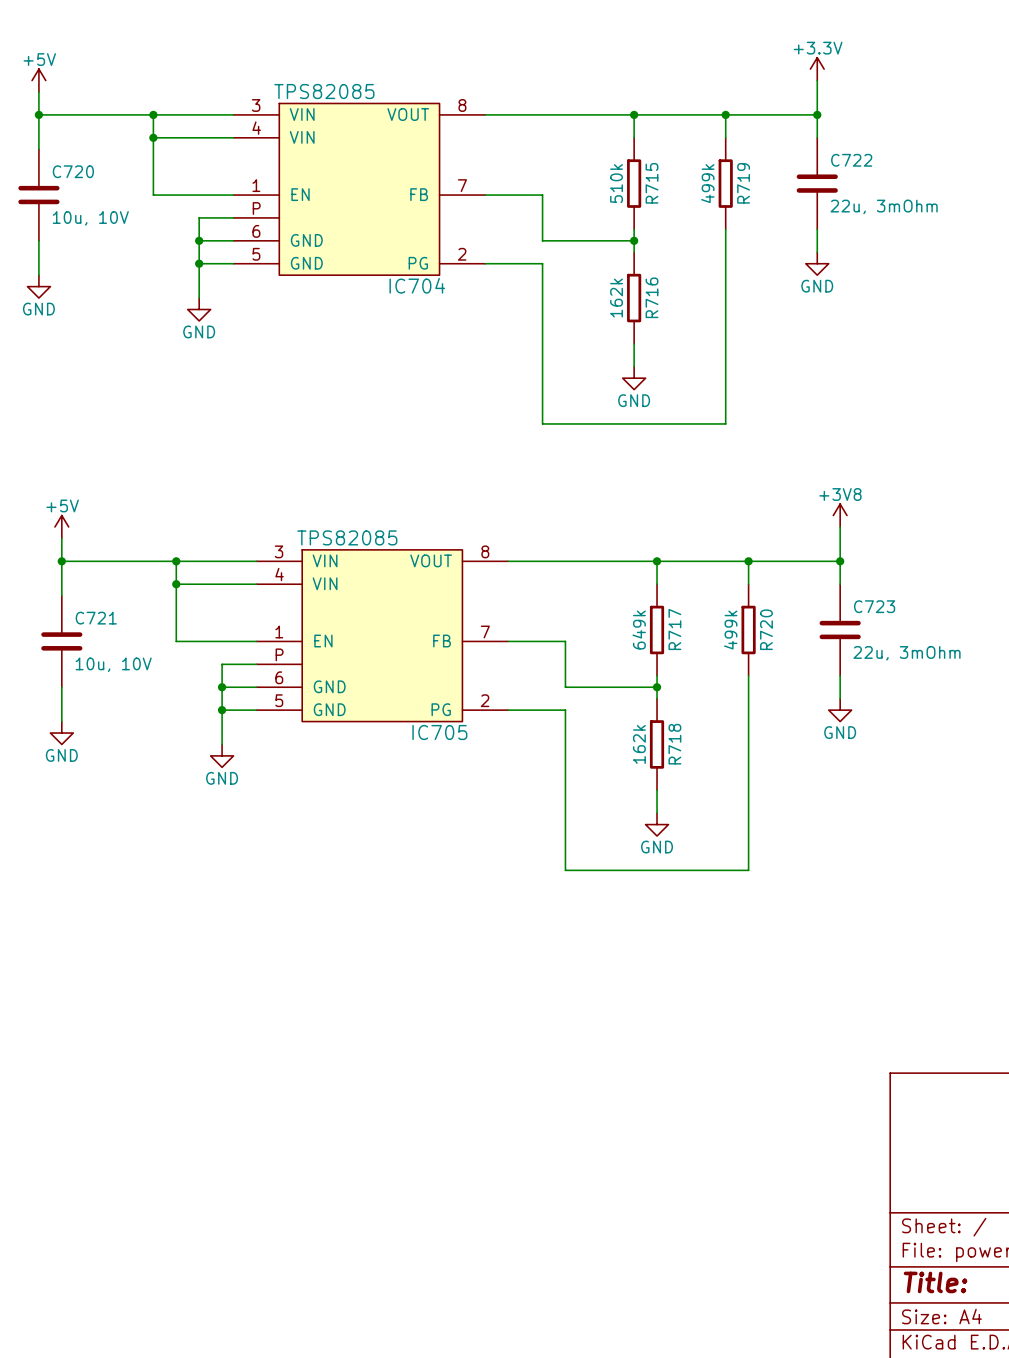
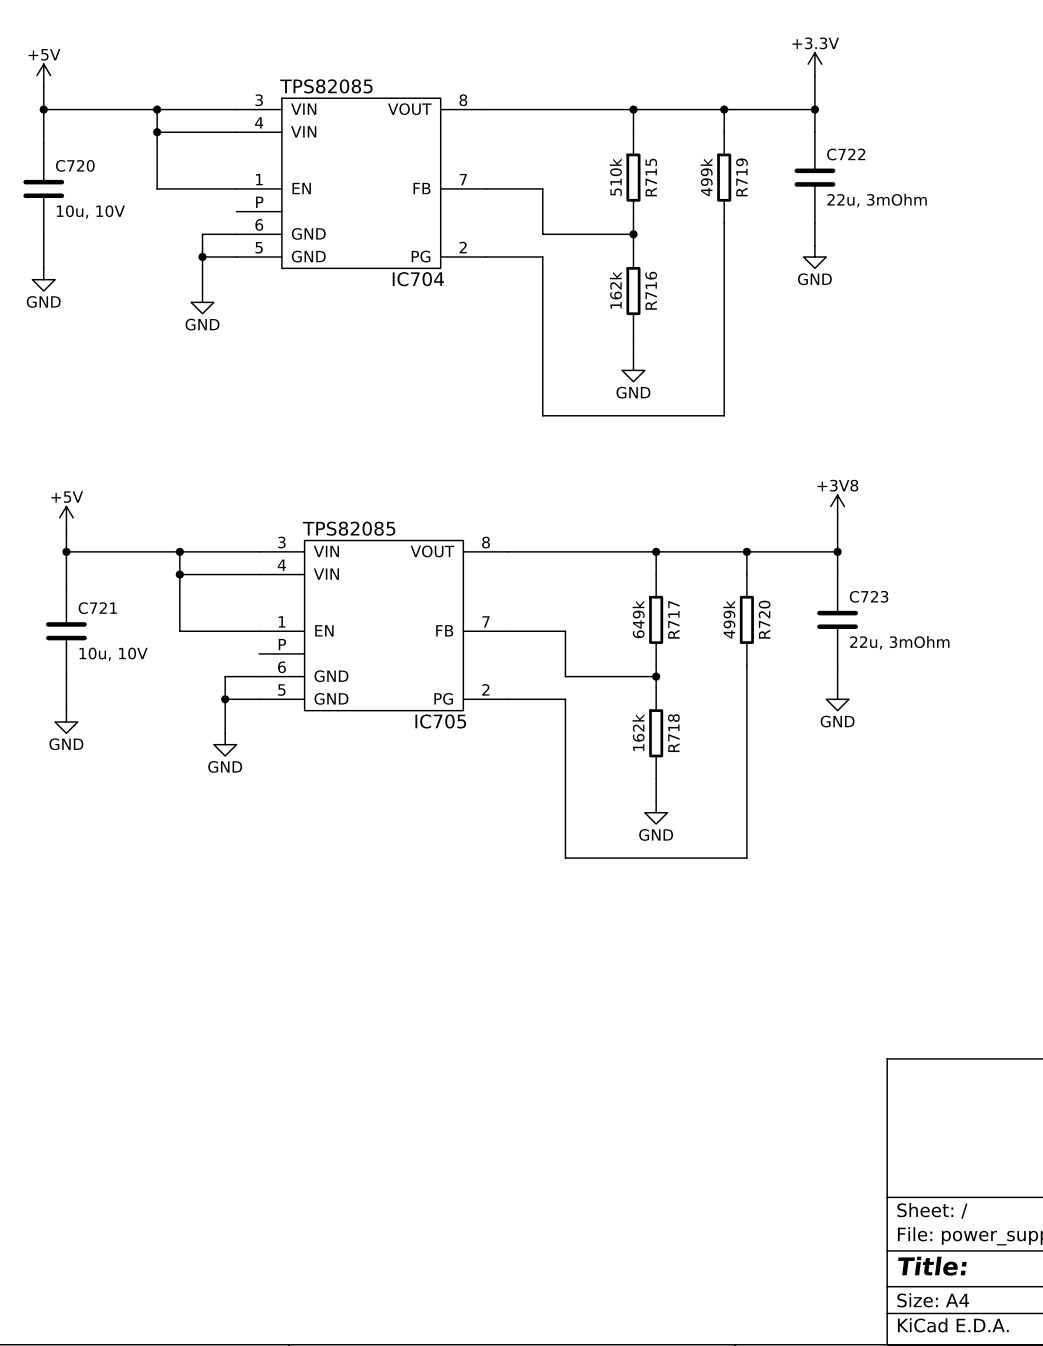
wire: (233, 217) (199, 217) (199, 240) -> none
junction: (199, 240) -> none
wire: (256, 664) (222, 664) (222, 687) -> none
junction: (222, 687) -> none

